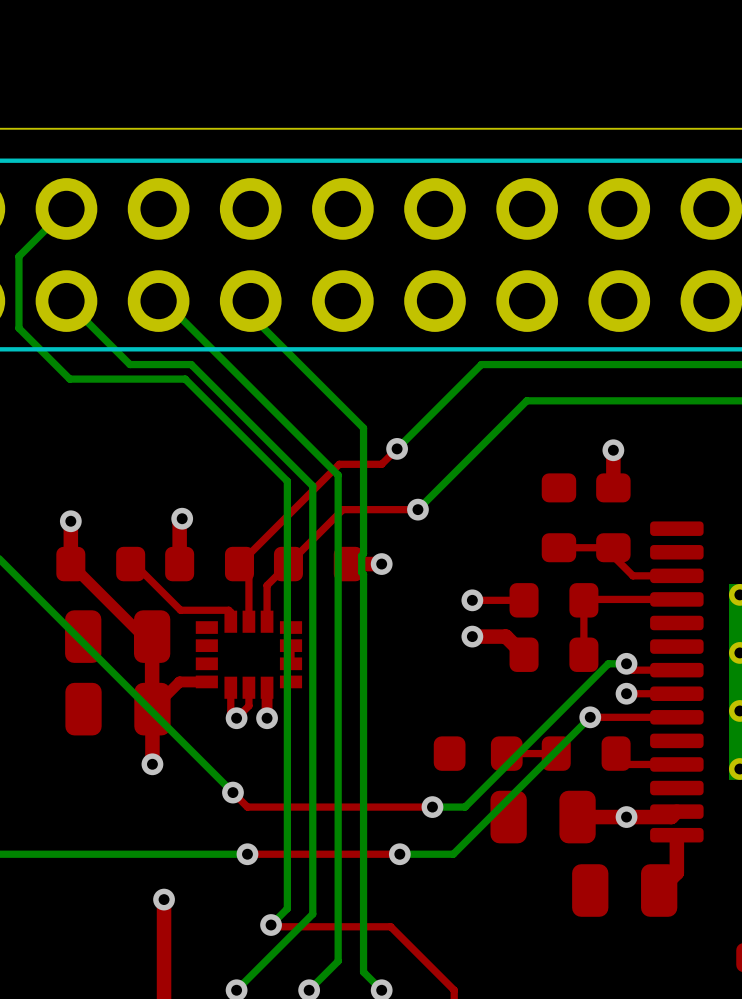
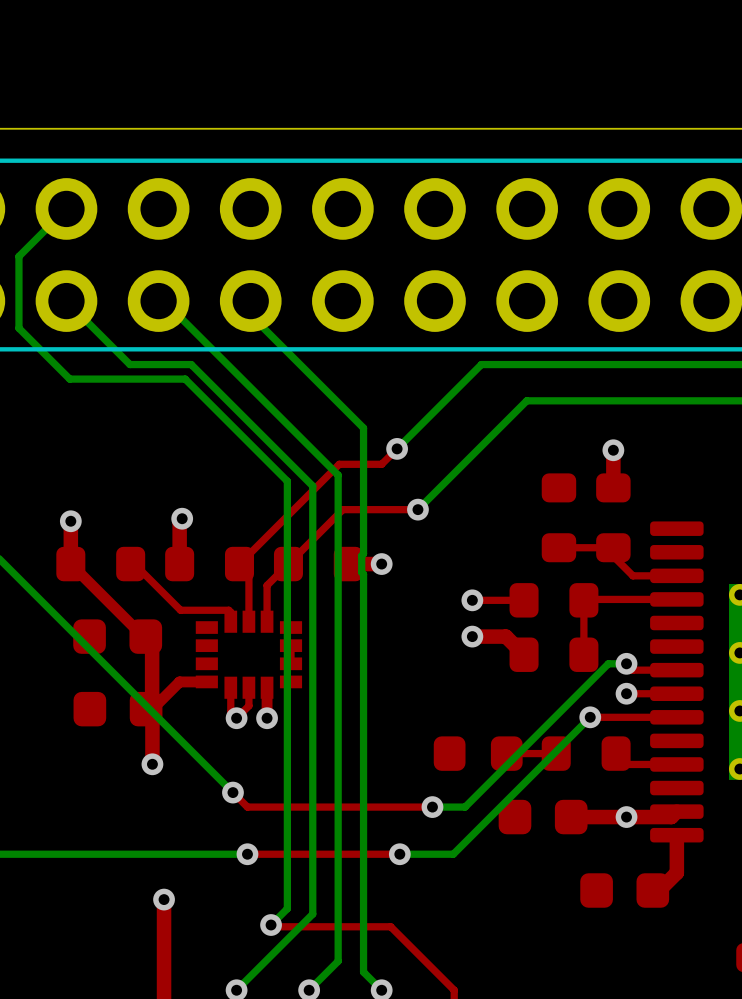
part footprint: [65, 610, 171, 663] -> [73, 619, 163, 654]
part footprint: [65, 682, 171, 736] -> [73, 691, 163, 727]
part footprint: [490, 790, 596, 844] -> [498, 799, 588, 835]
part footprint: [572, 864, 678, 917] -> [580, 873, 670, 908]

